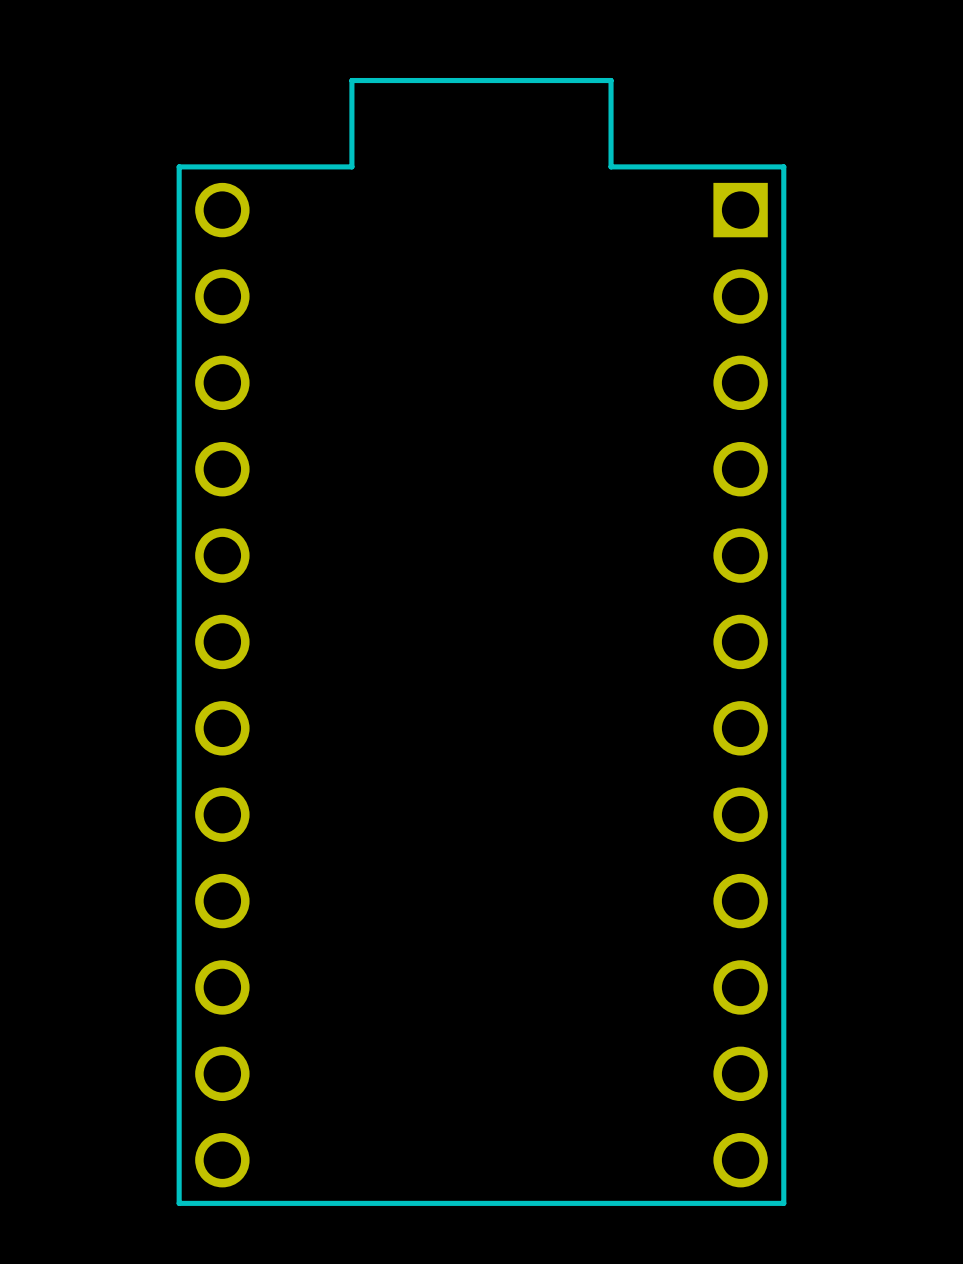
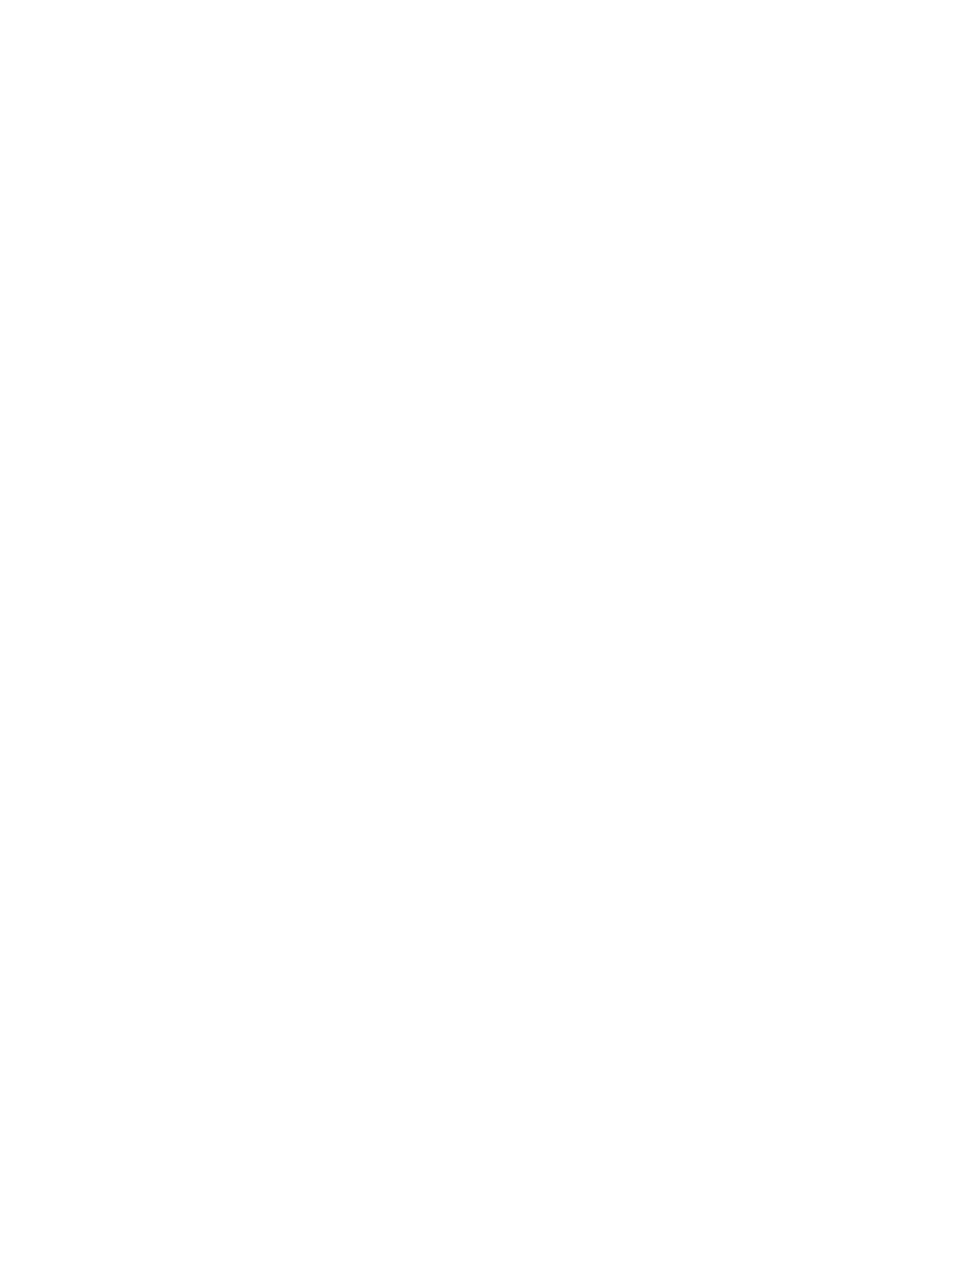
part: (481, 641) -> none

